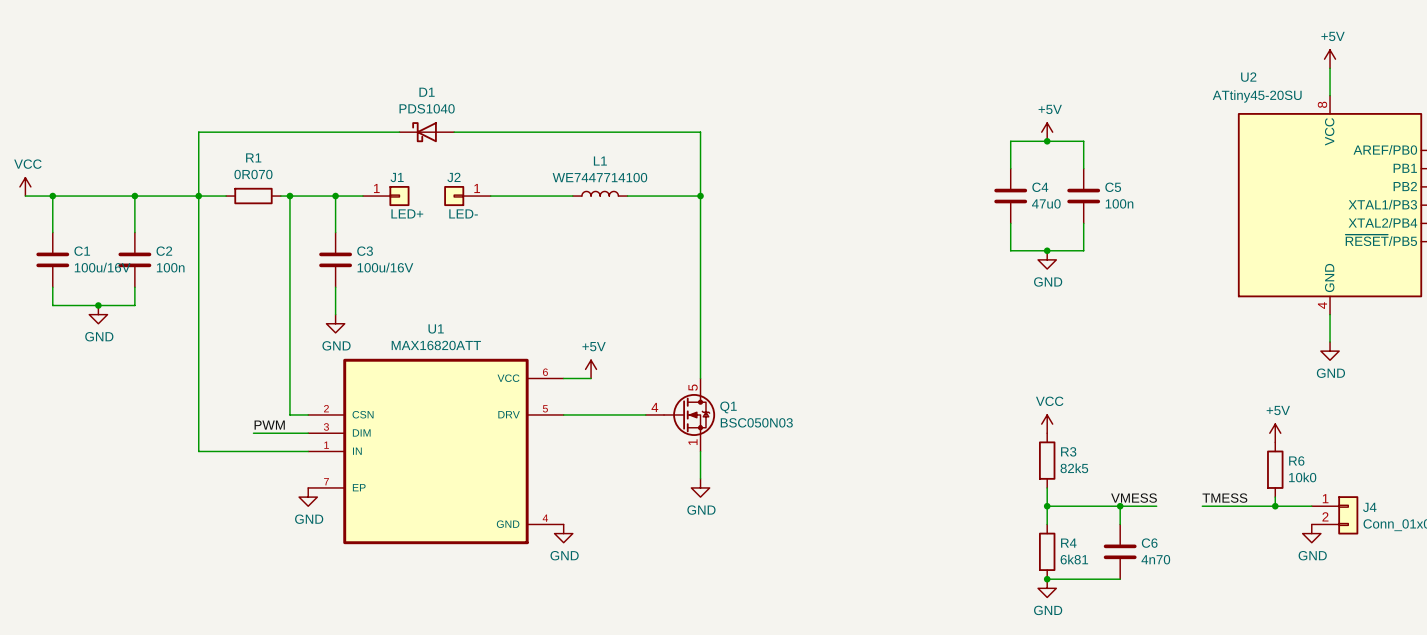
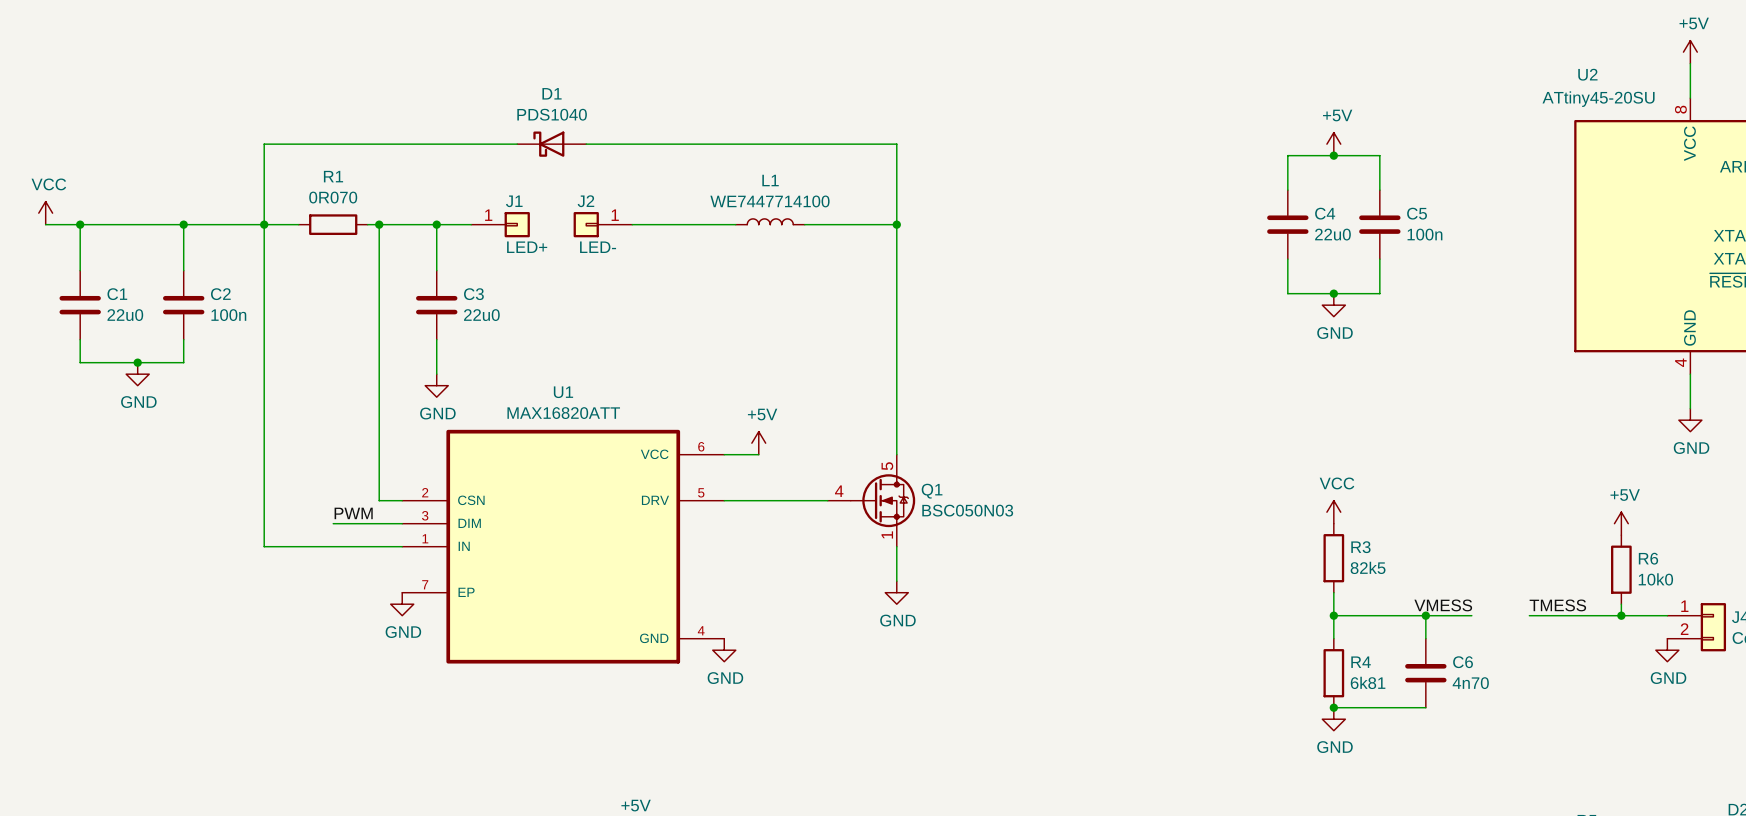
C4 value: 47u0 (1046, 203) -> 22u0 (1332, 234)
C1 value: 100u/16V (102, 267) -> 22u0 (125, 315)
C3 value: 100u/16V (385, 267) -> 22u0 (481, 315)

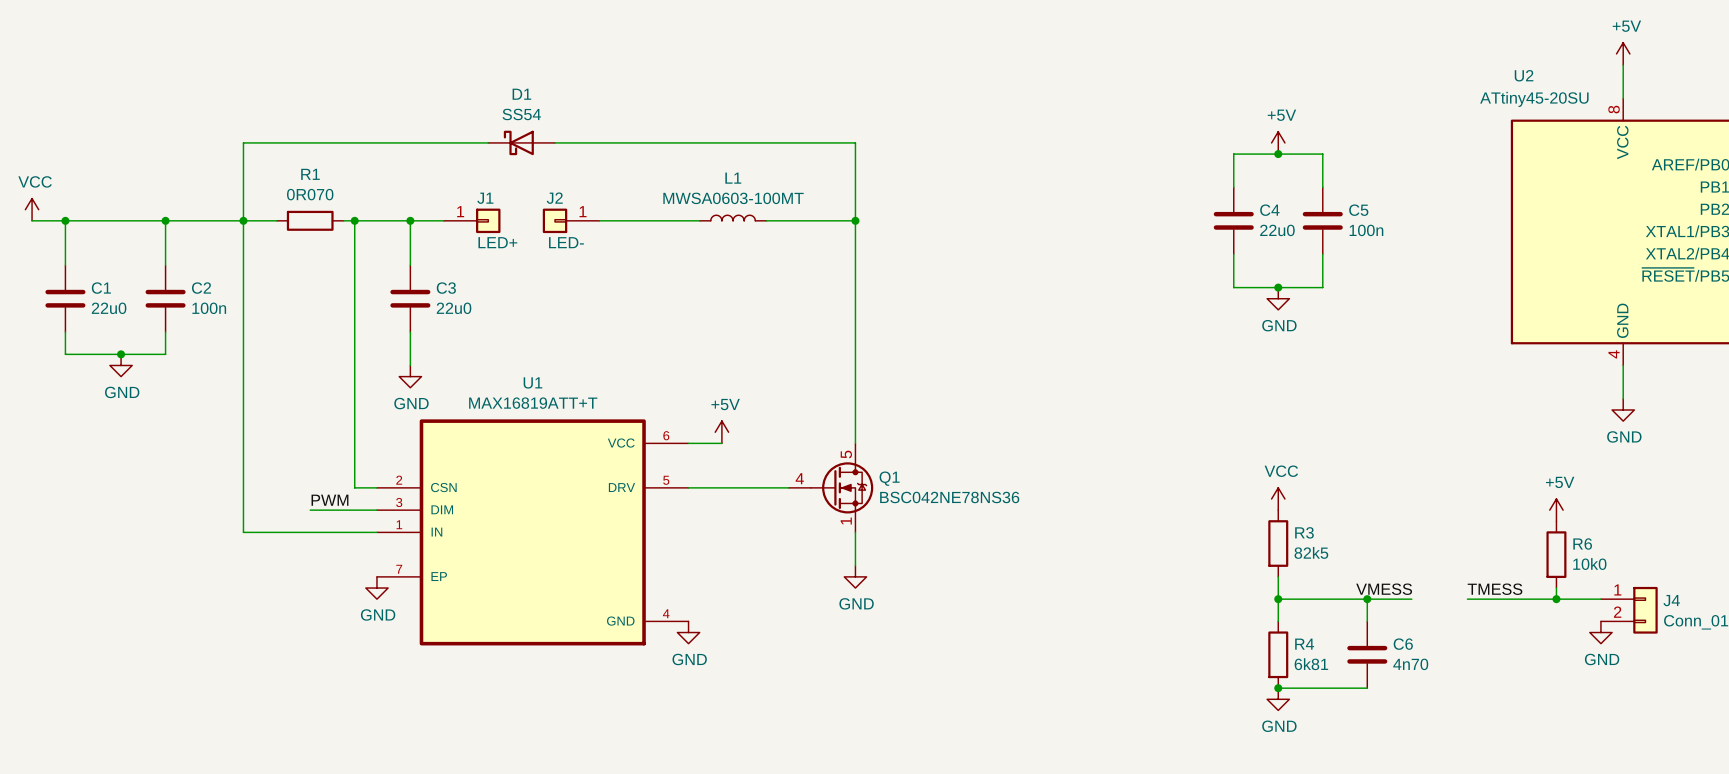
D1 value: PDS1040 (552, 114) -> SS54 (521, 114)
L1 value: WE7447714100 (769, 201) -> MWSA0603-100MT (733, 198)
U1 value: MAX16820ATT (563, 413) -> MAX16819ATT+T (533, 403)
Q1 value: BSC050N03 (967, 510) -> BSC042NE78NS36 (949, 497)

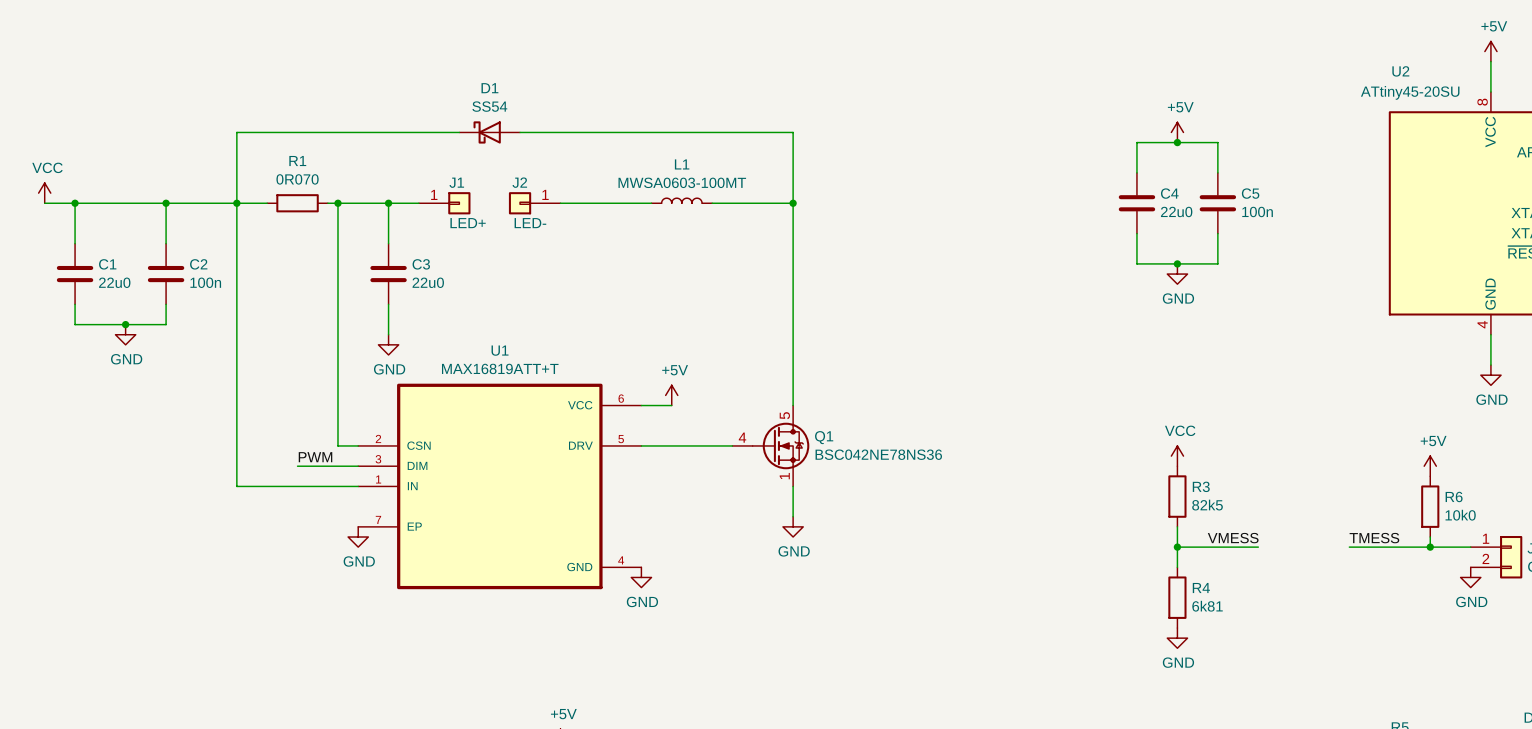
label position: VMESS (1384, 589) -> VMESS (1233, 538)
junction: (1367, 599) -> none
wire: (1411, 599) (1367, 599) (1367, 621) -> none
C6: 4n70 (1367, 654) -> none
wire: (1278, 688) (1367, 688) -> none
junction: (1278, 688) -> none

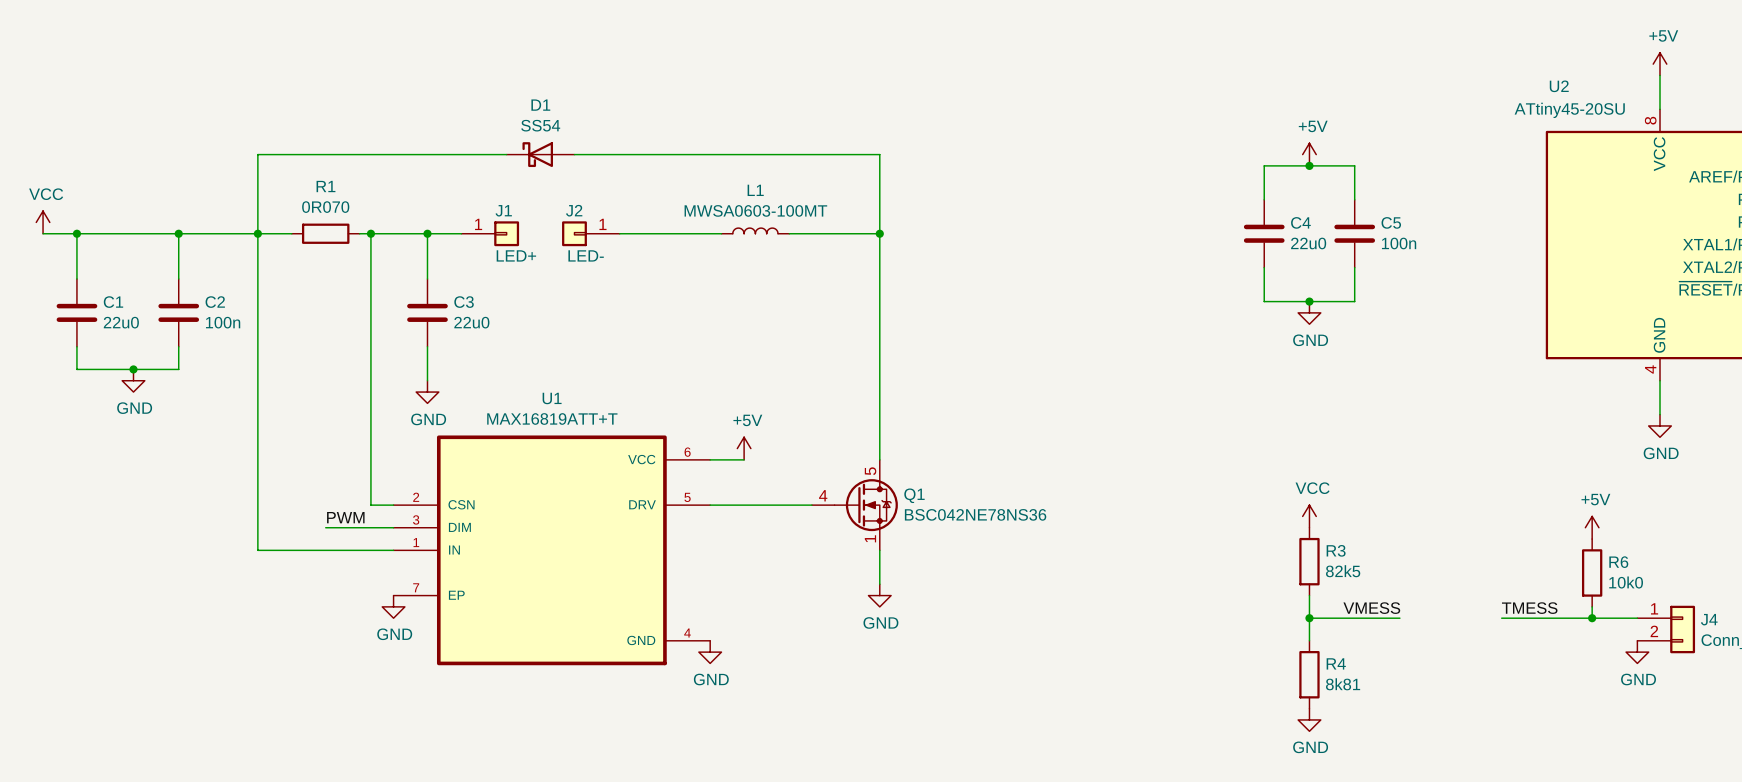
R4 value: 6k81 (1207, 606) -> 8k81 (1343, 684)

